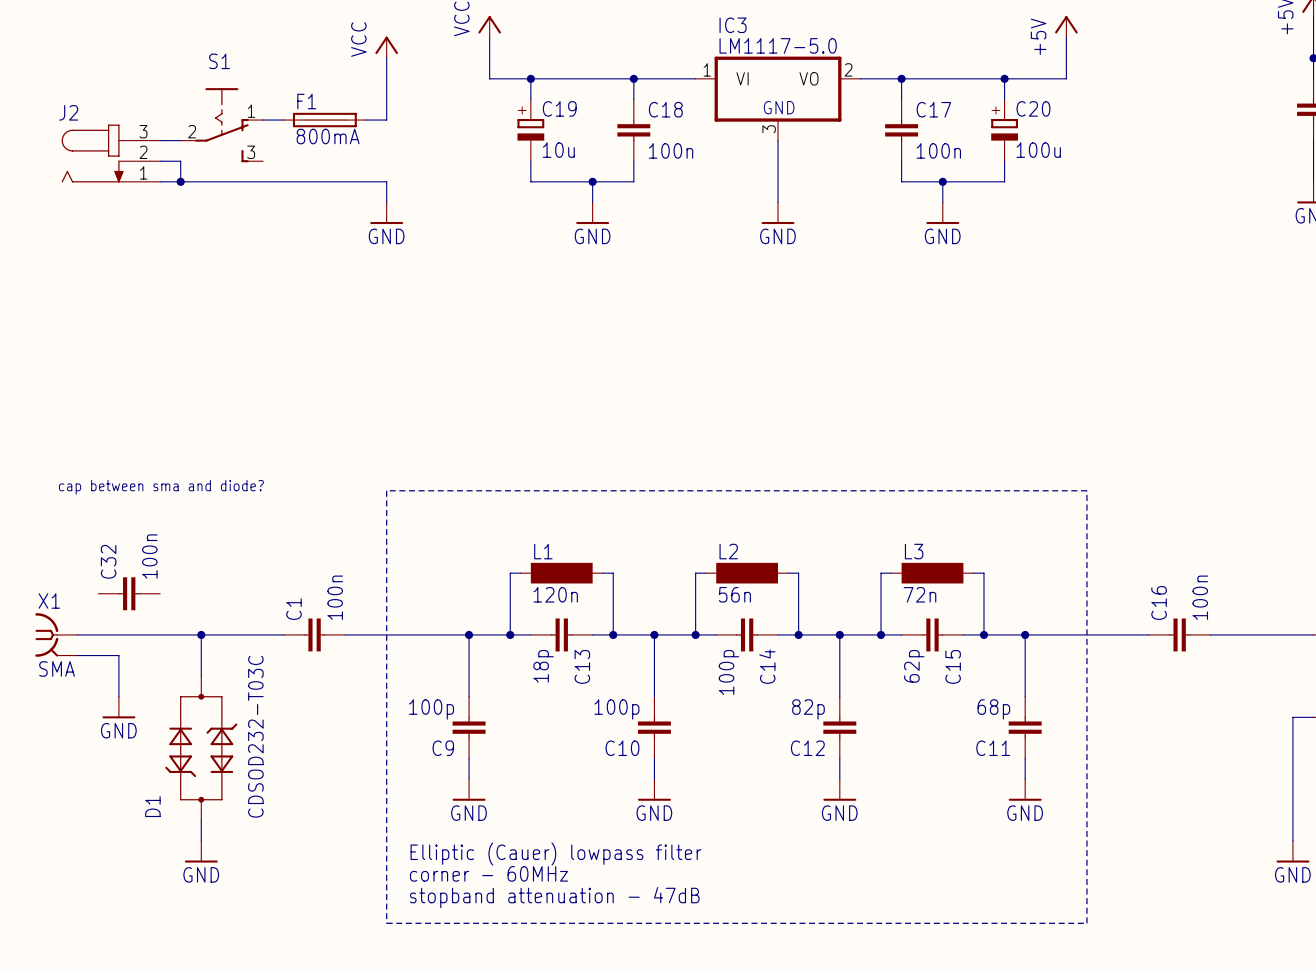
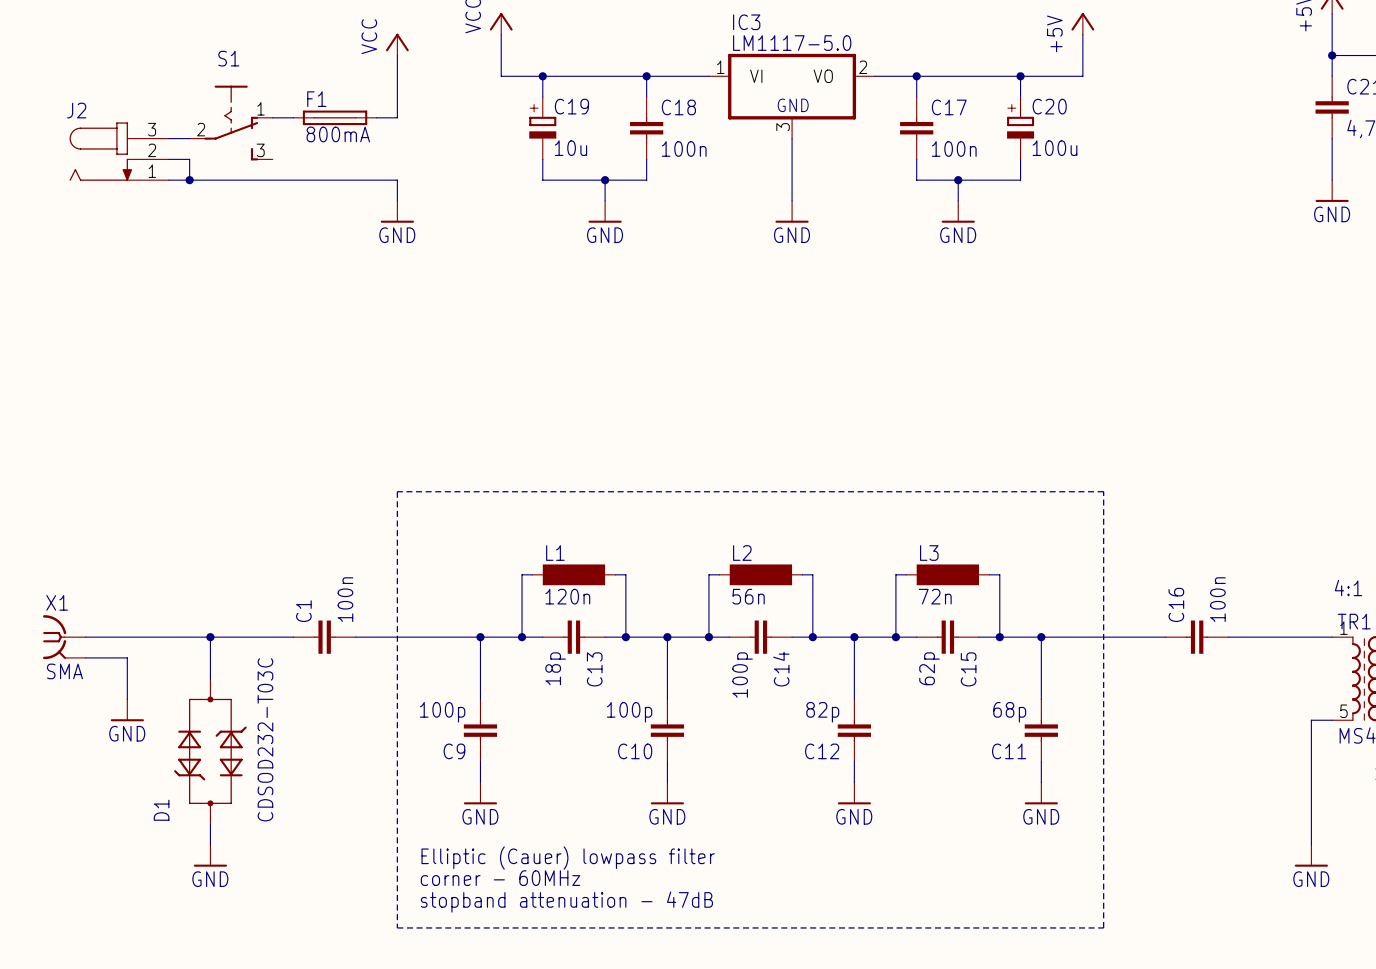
text: cap between sma and diode? (161, 487) -> none
C32: 100n (129, 593) -> none

